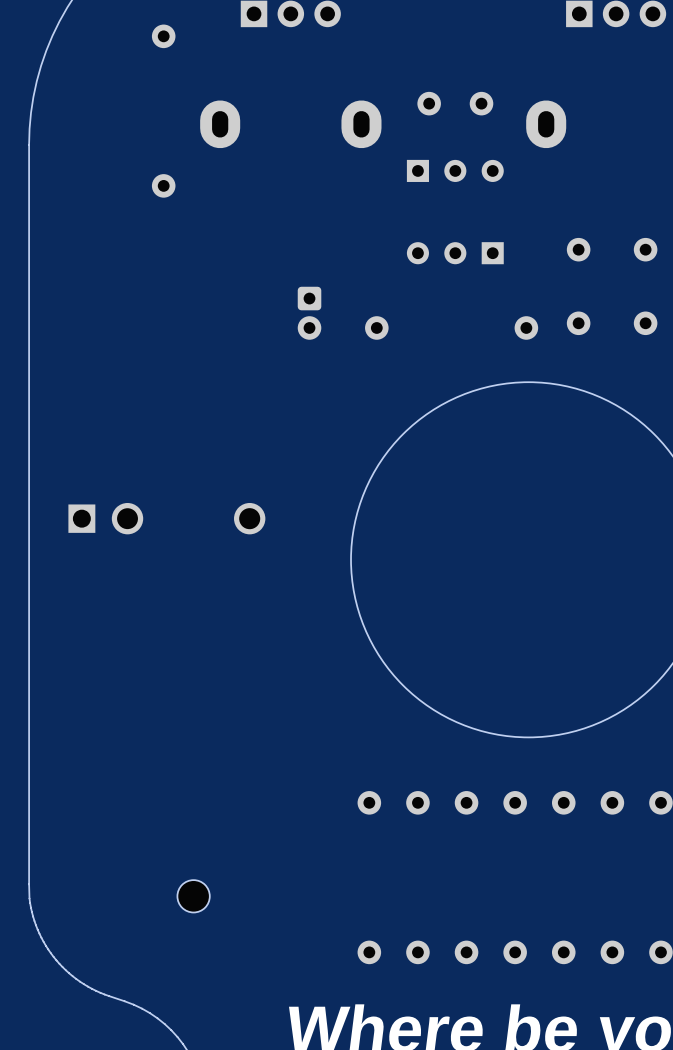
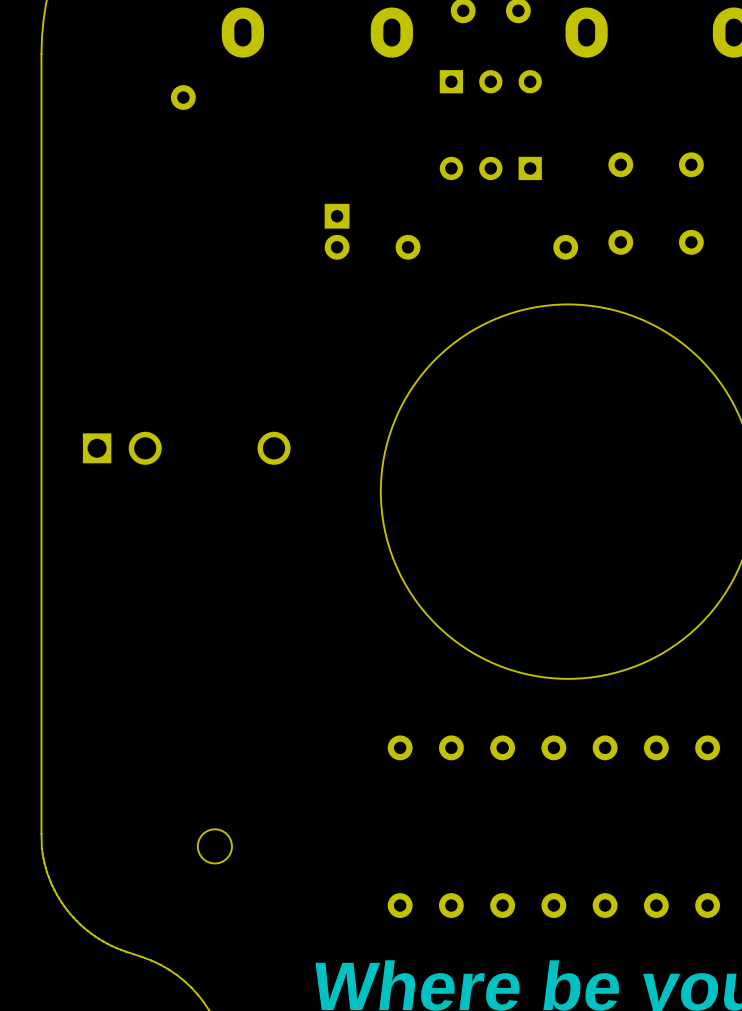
part footprint: [297, 286, 322, 340] -> [324, 203, 350, 260]

